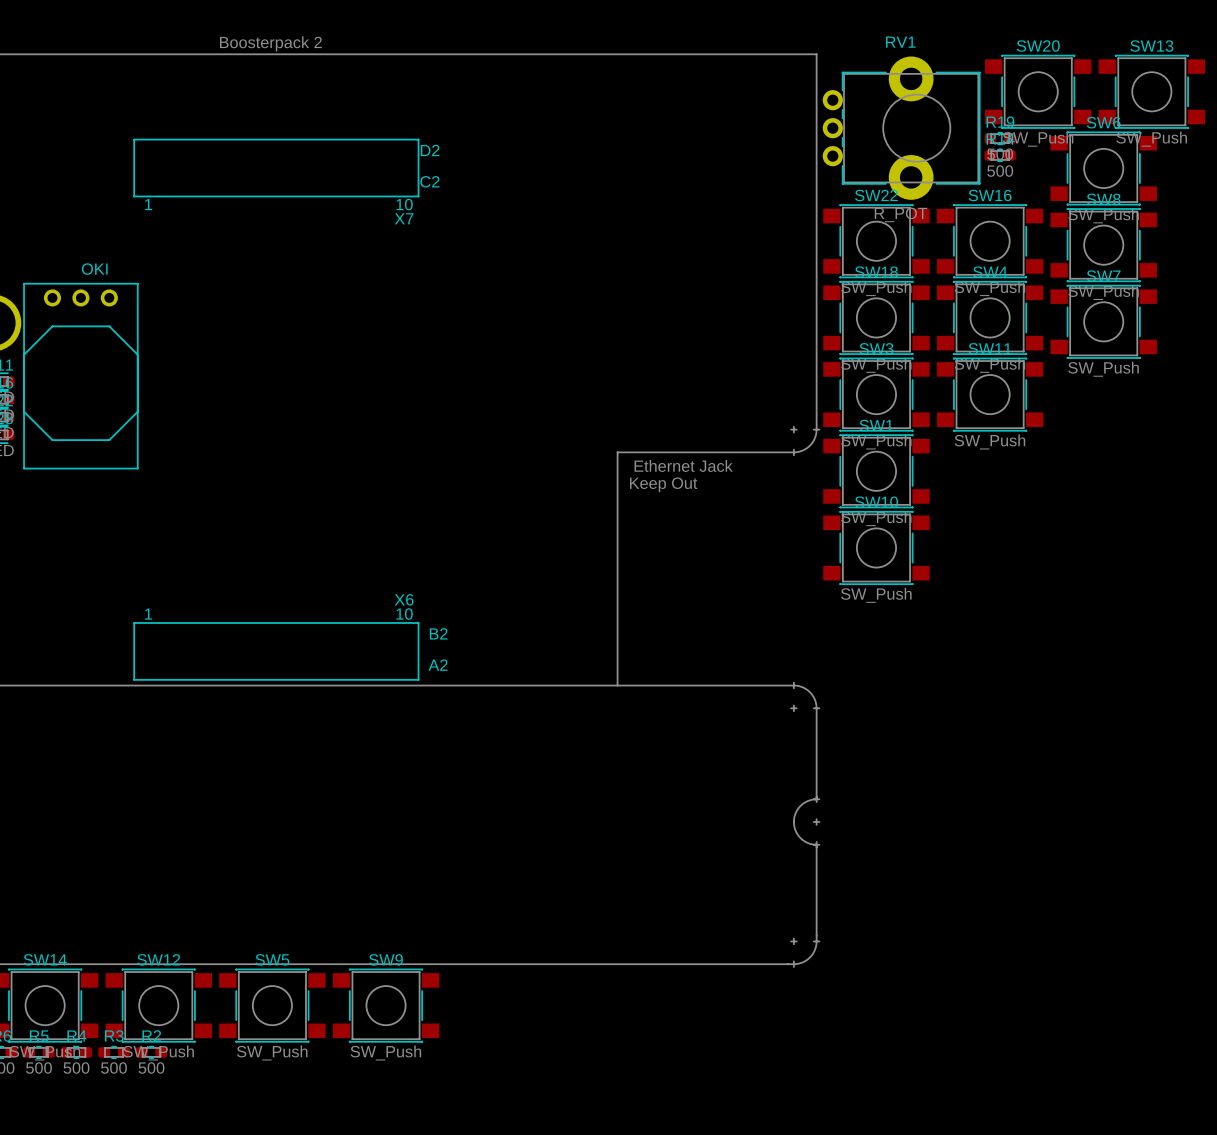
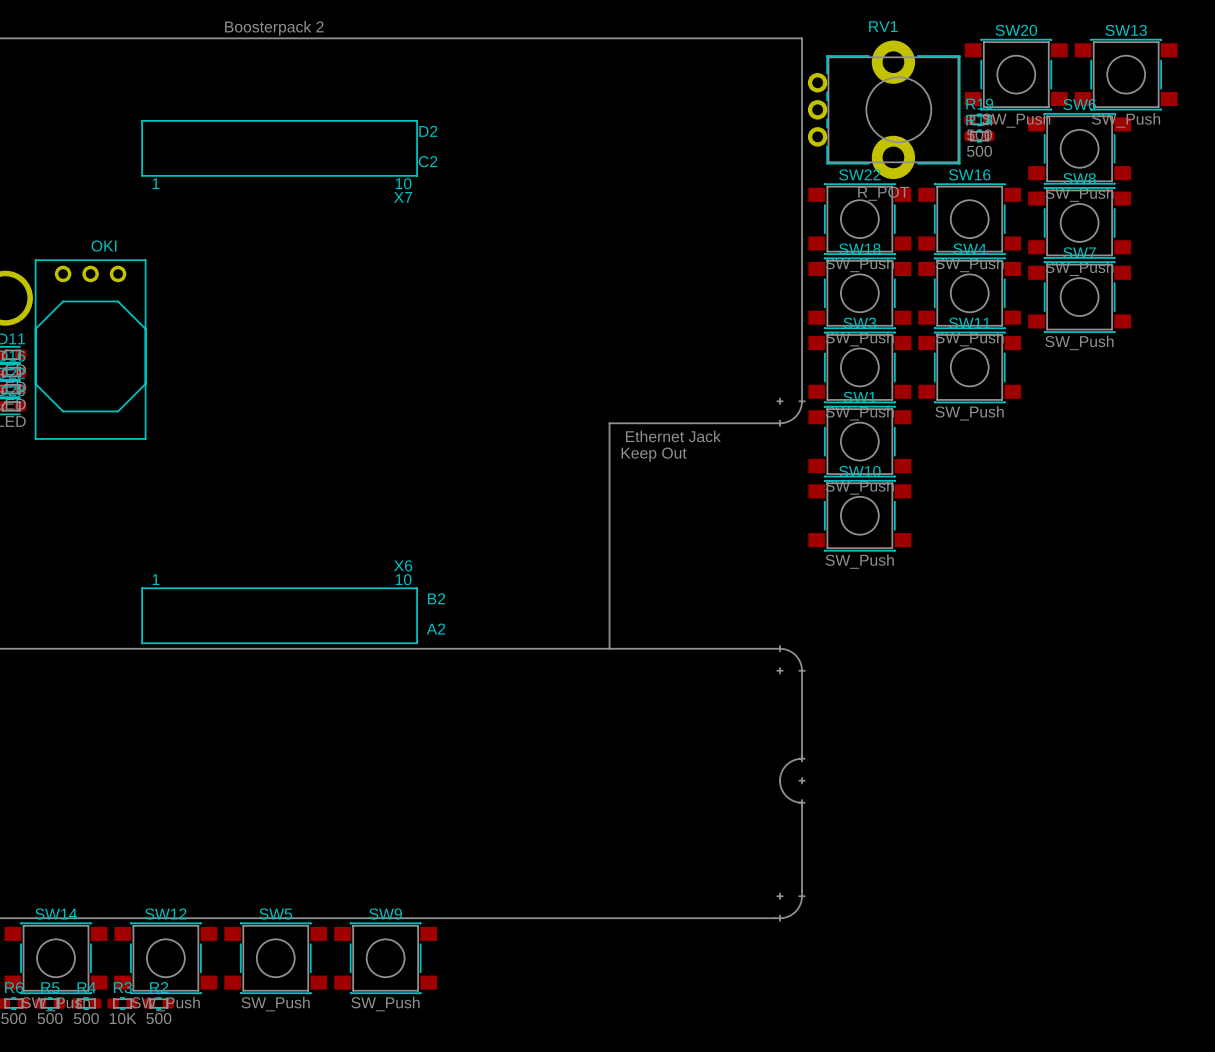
R3 value: 500 (113, 1068) -> 10K (123, 1018)

